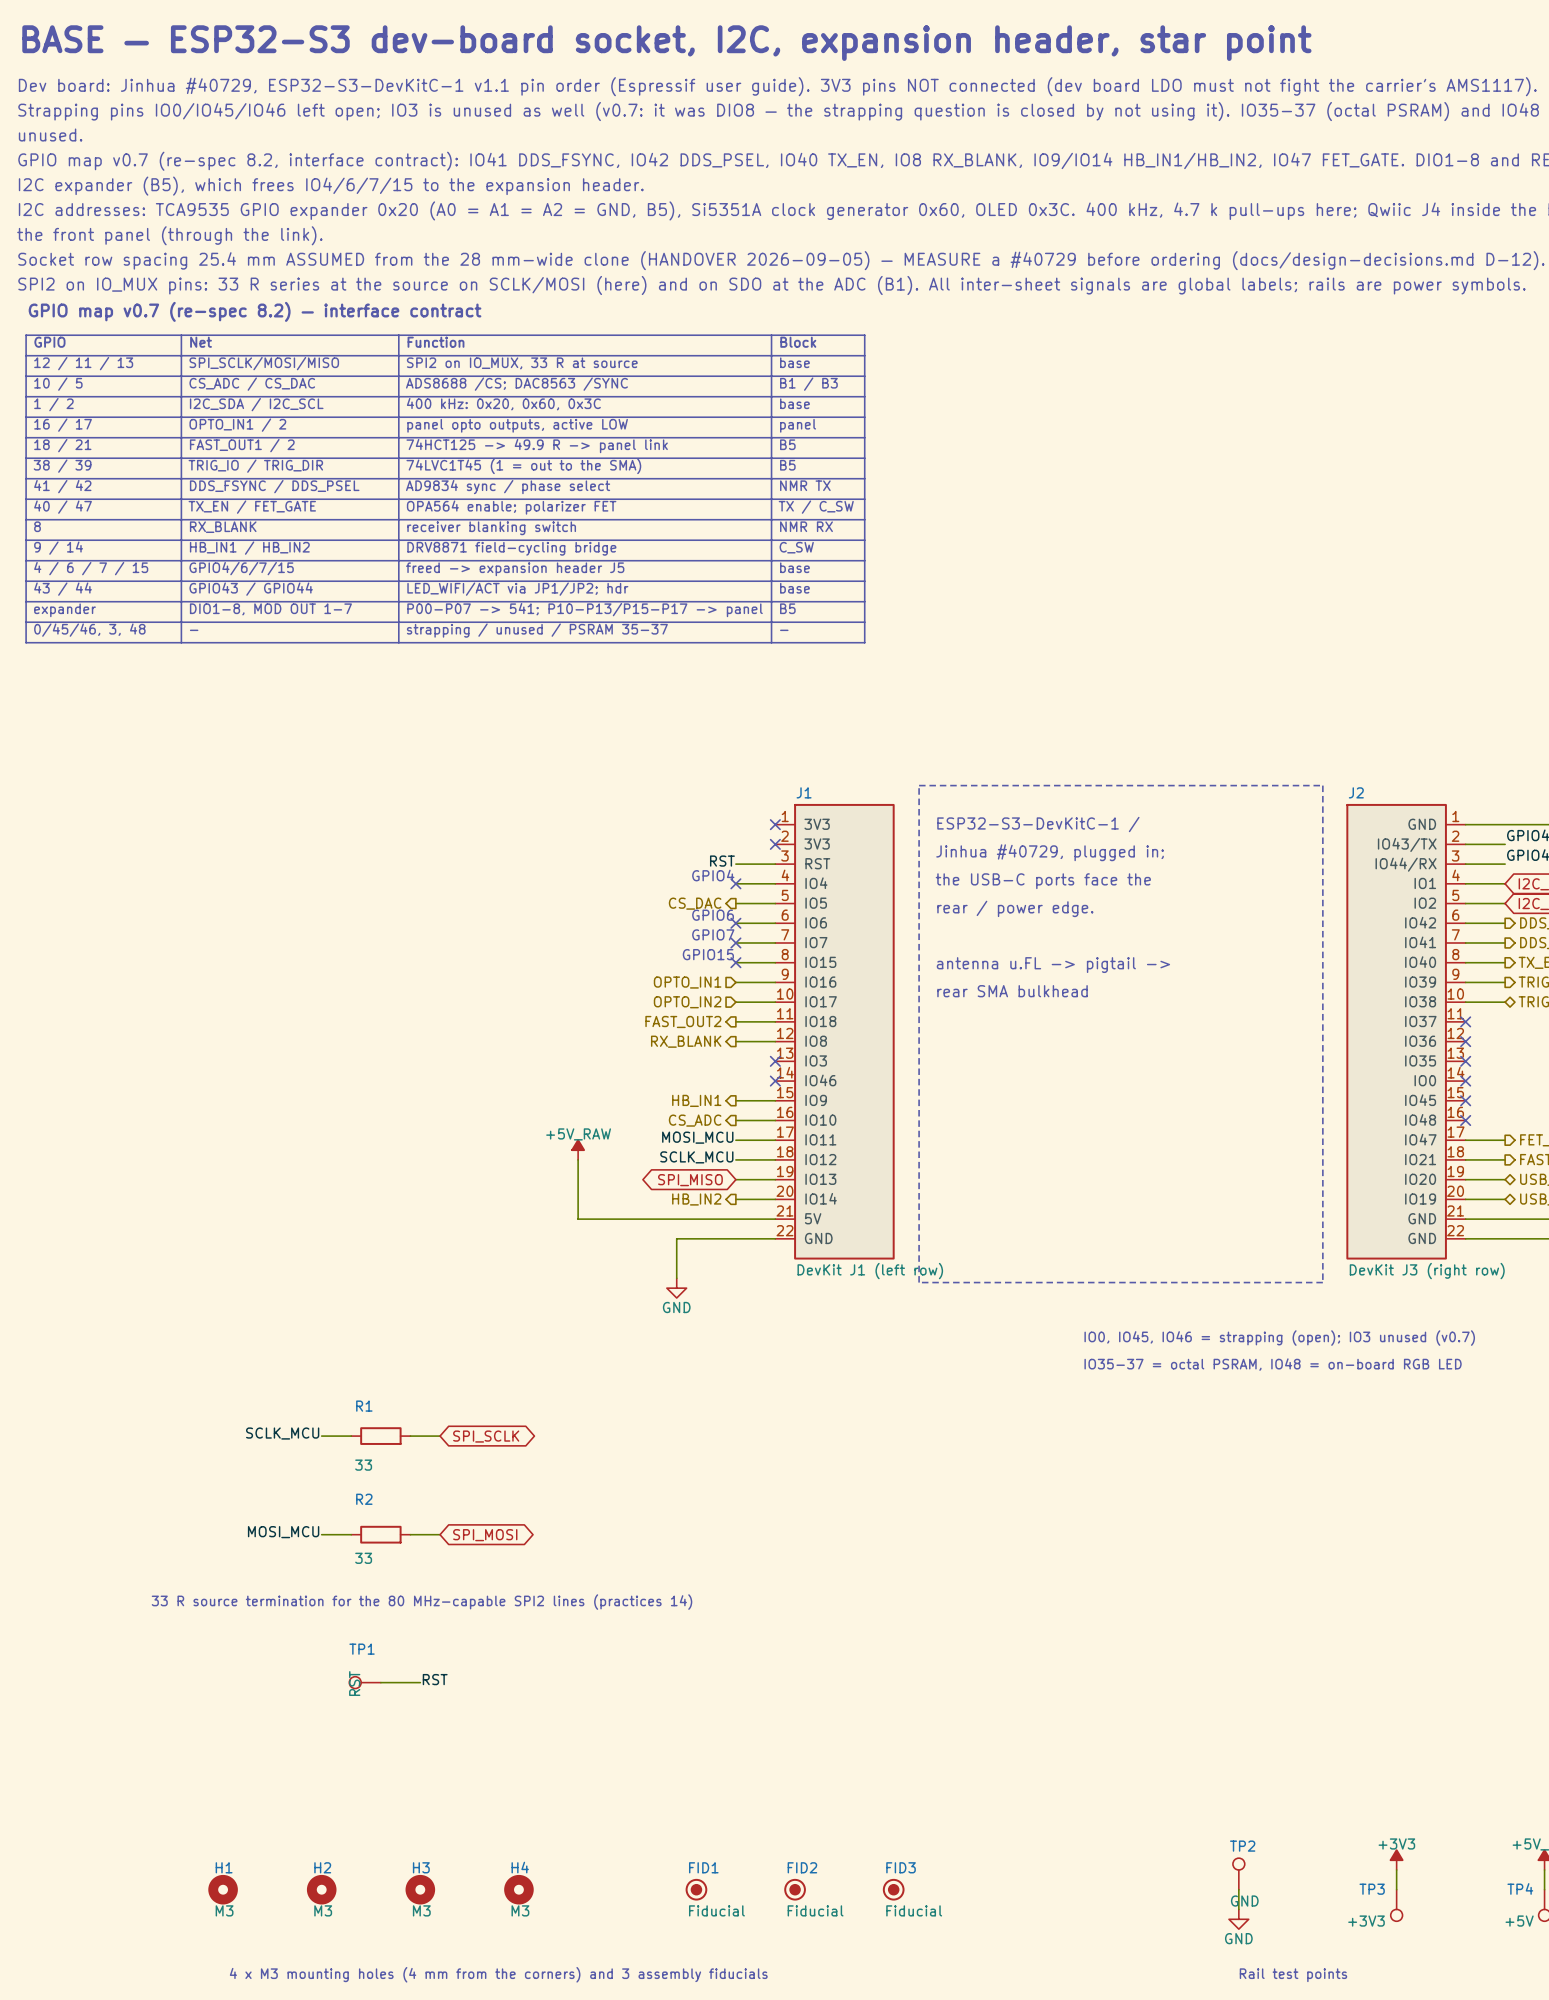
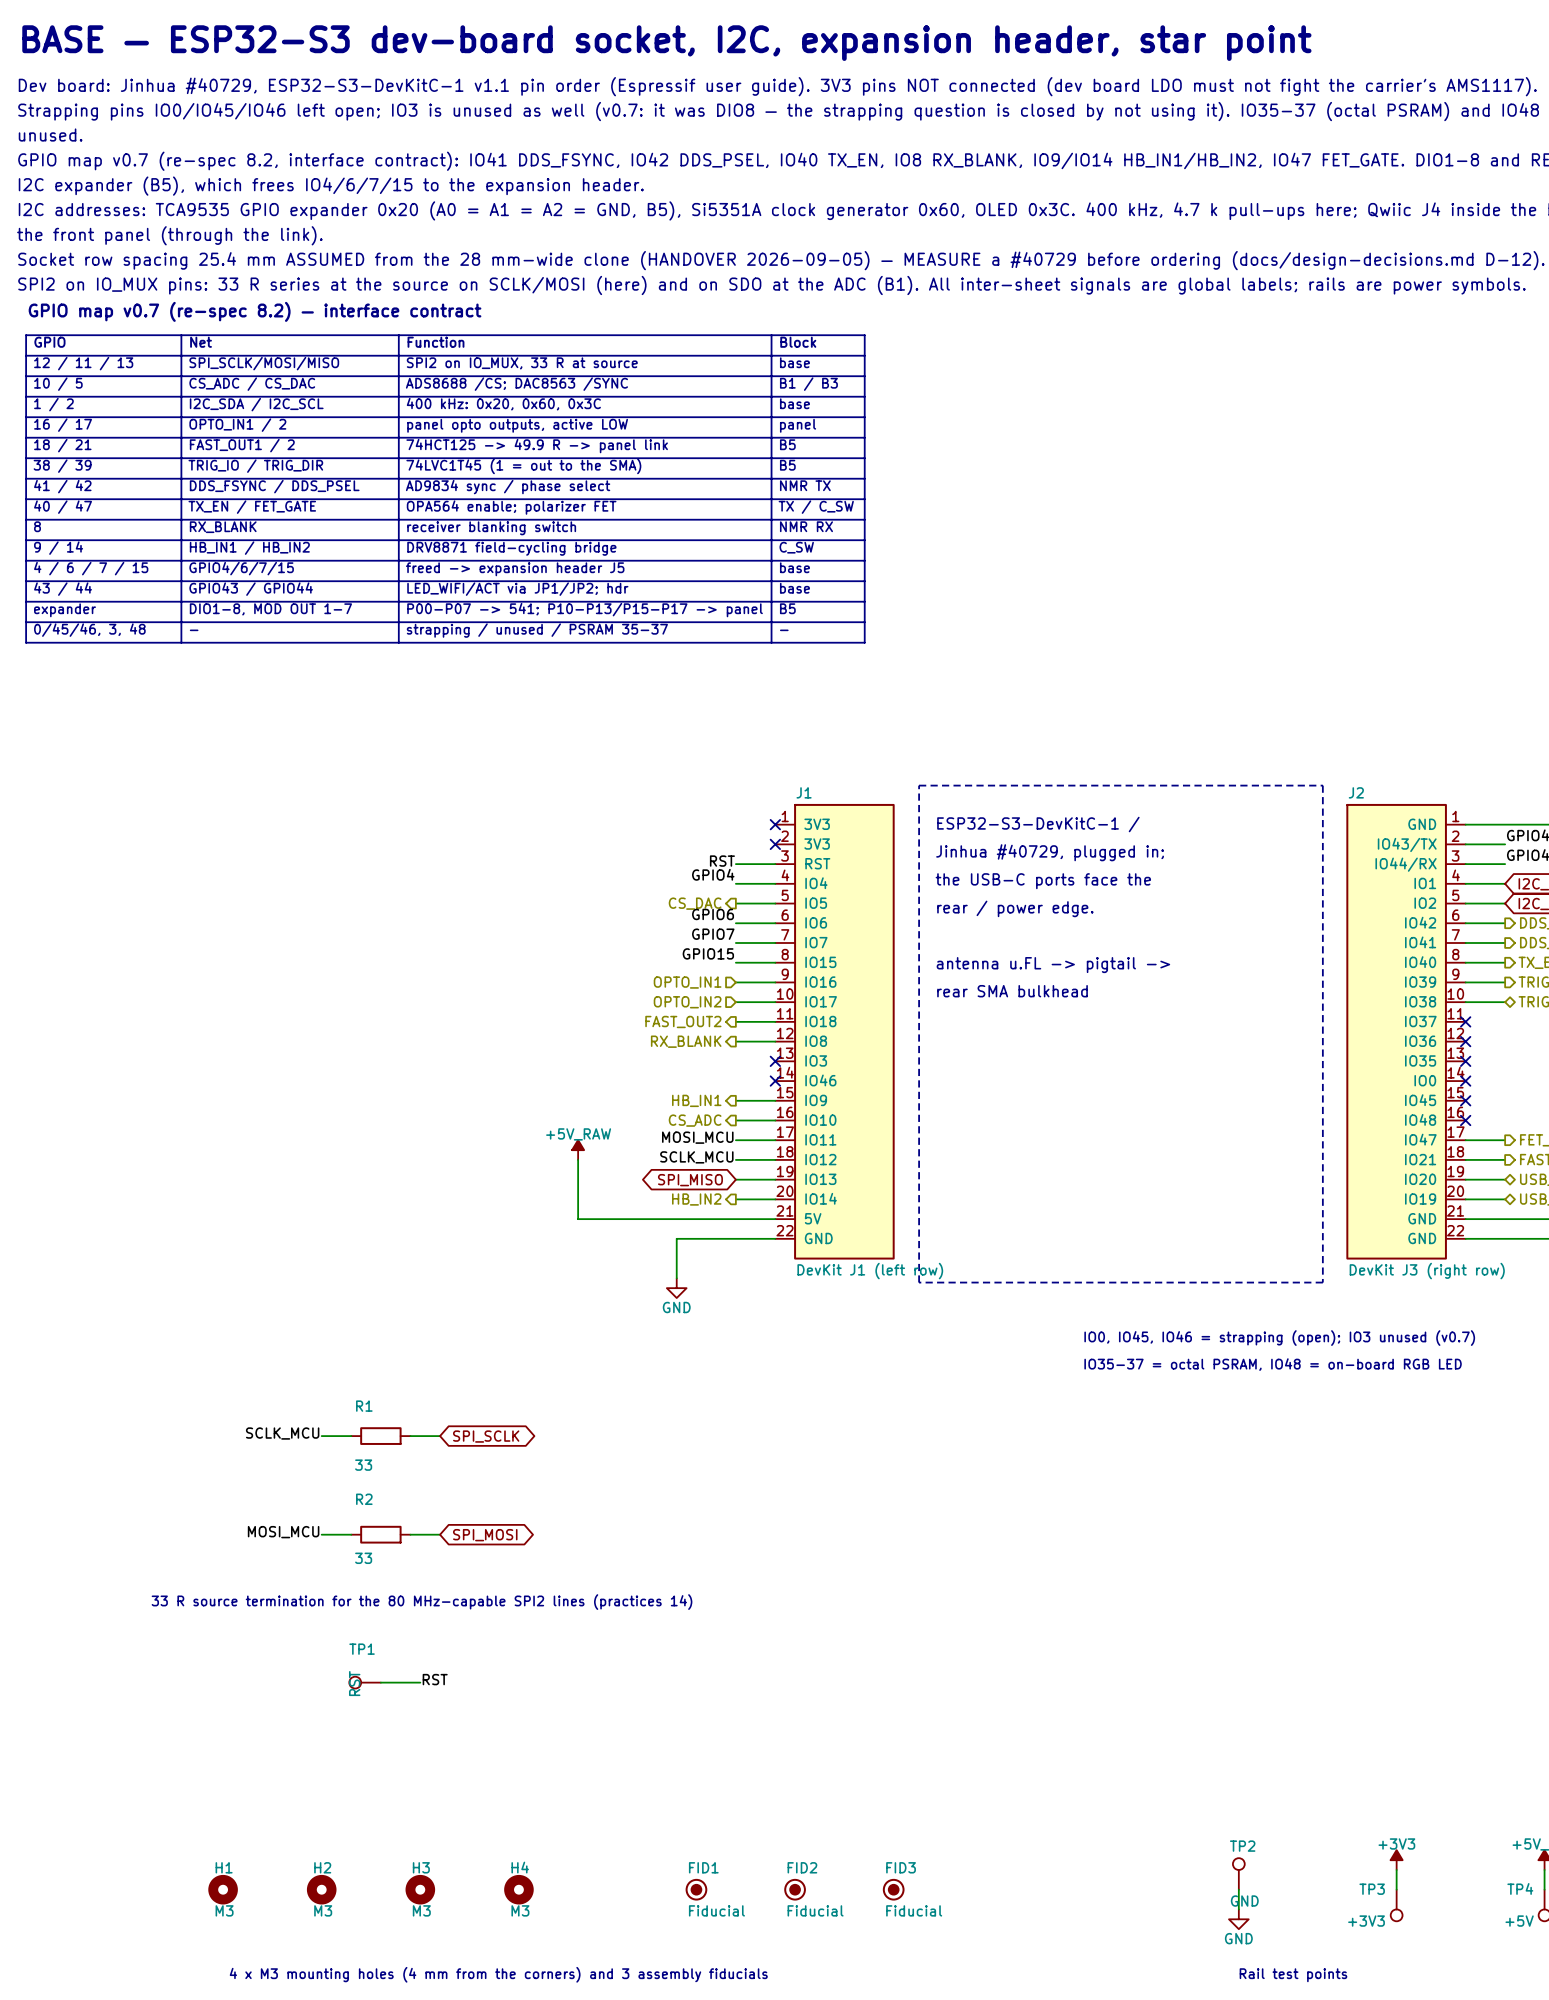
label: none -> GPIO4 (713, 874)
text: GPIO4 (713, 875) -> none
no-connect mark: (735, 883) -> none
label: none -> GPIO6 (713, 914)
text: GPIO6 (713, 915) -> none
no-connect mark: (735, 923) -> none
text: GPIO7 (713, 934) -> none
label: none -> GPIO7 (713, 934)
no-connect mark: (735, 942) -> none
label: none -> GPIO15 (708, 953)
text: GPIO15 (708, 954) -> none
no-connect mark: (735, 962) -> none

